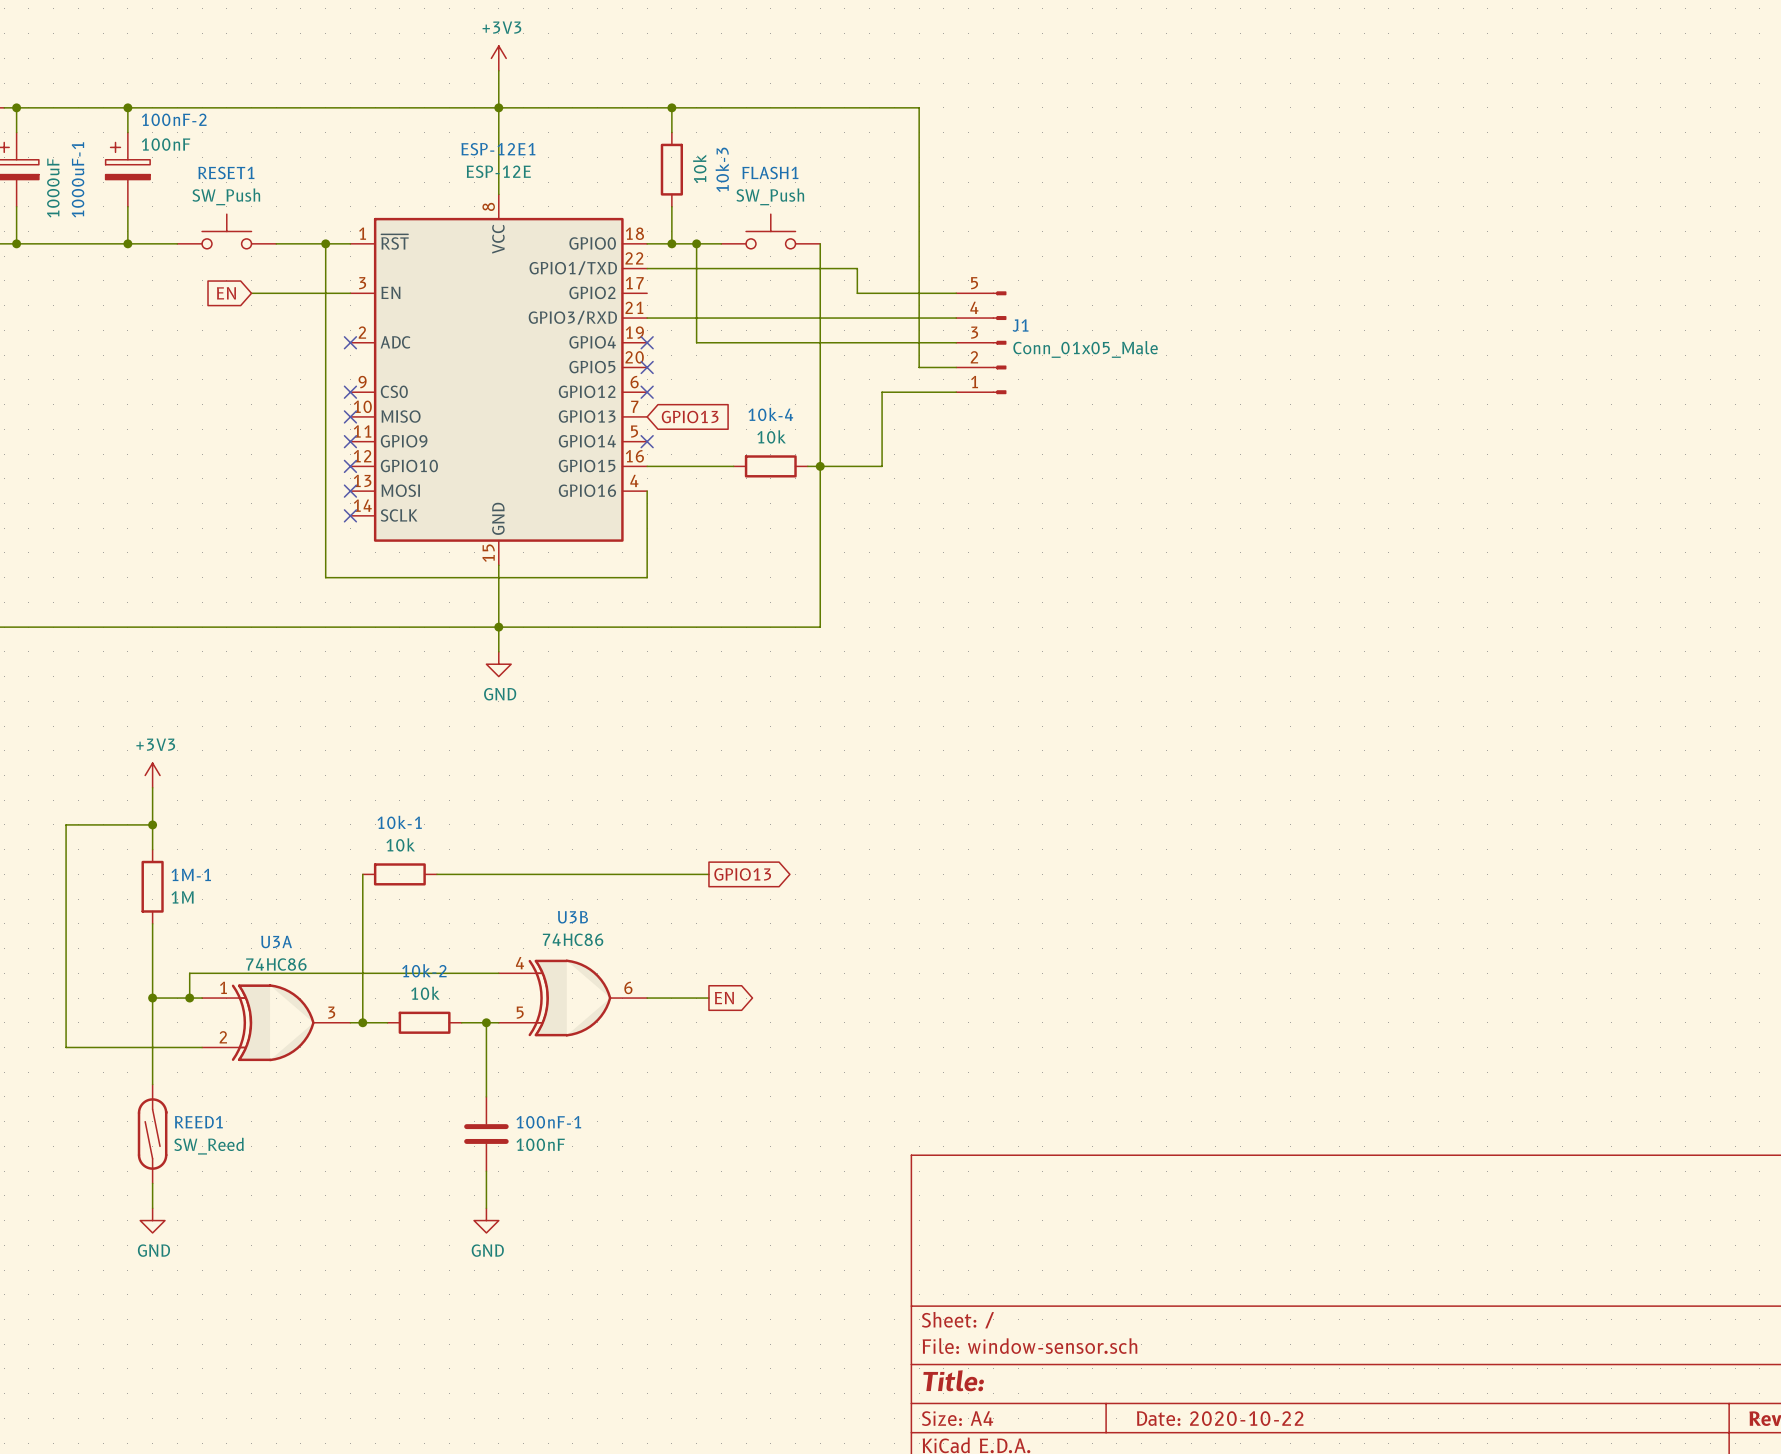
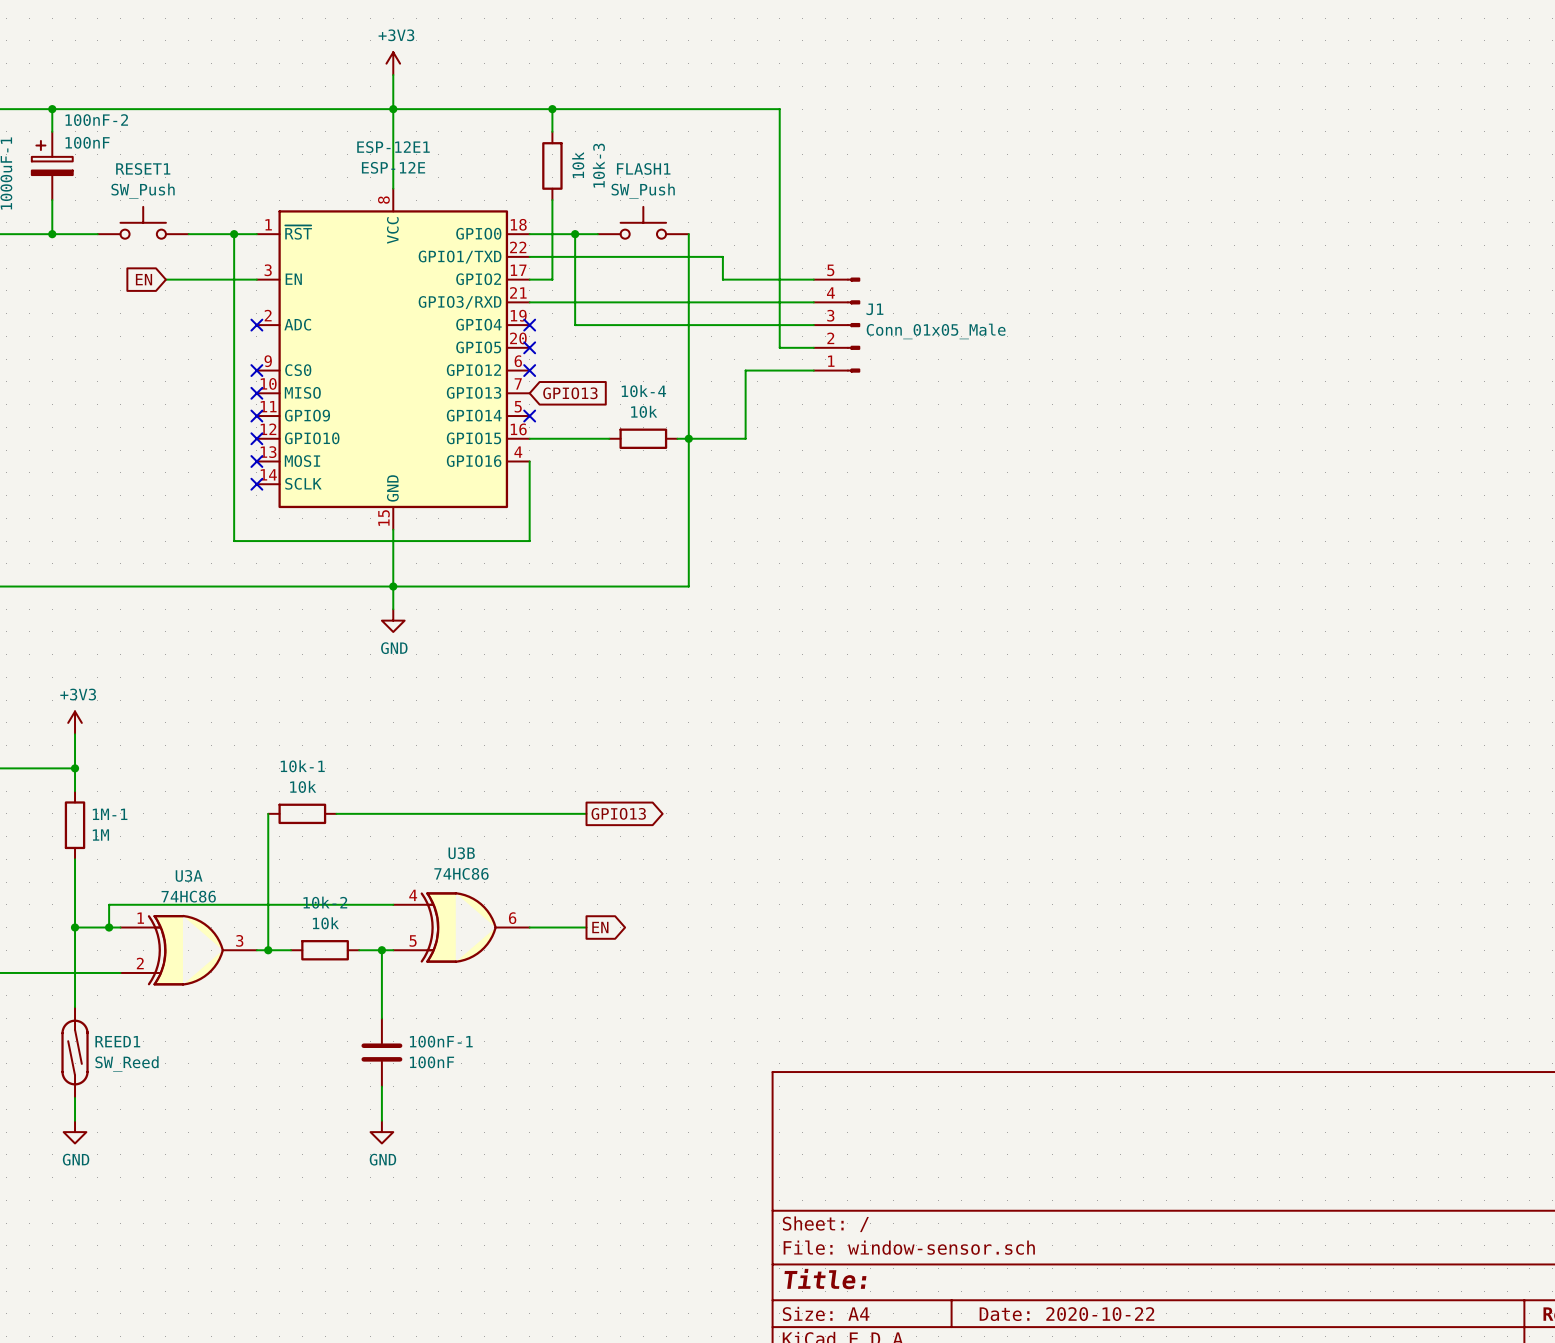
wire: none -> (552, 234) (552, 279) (529, 279)
junction: (671, 243) -> none

